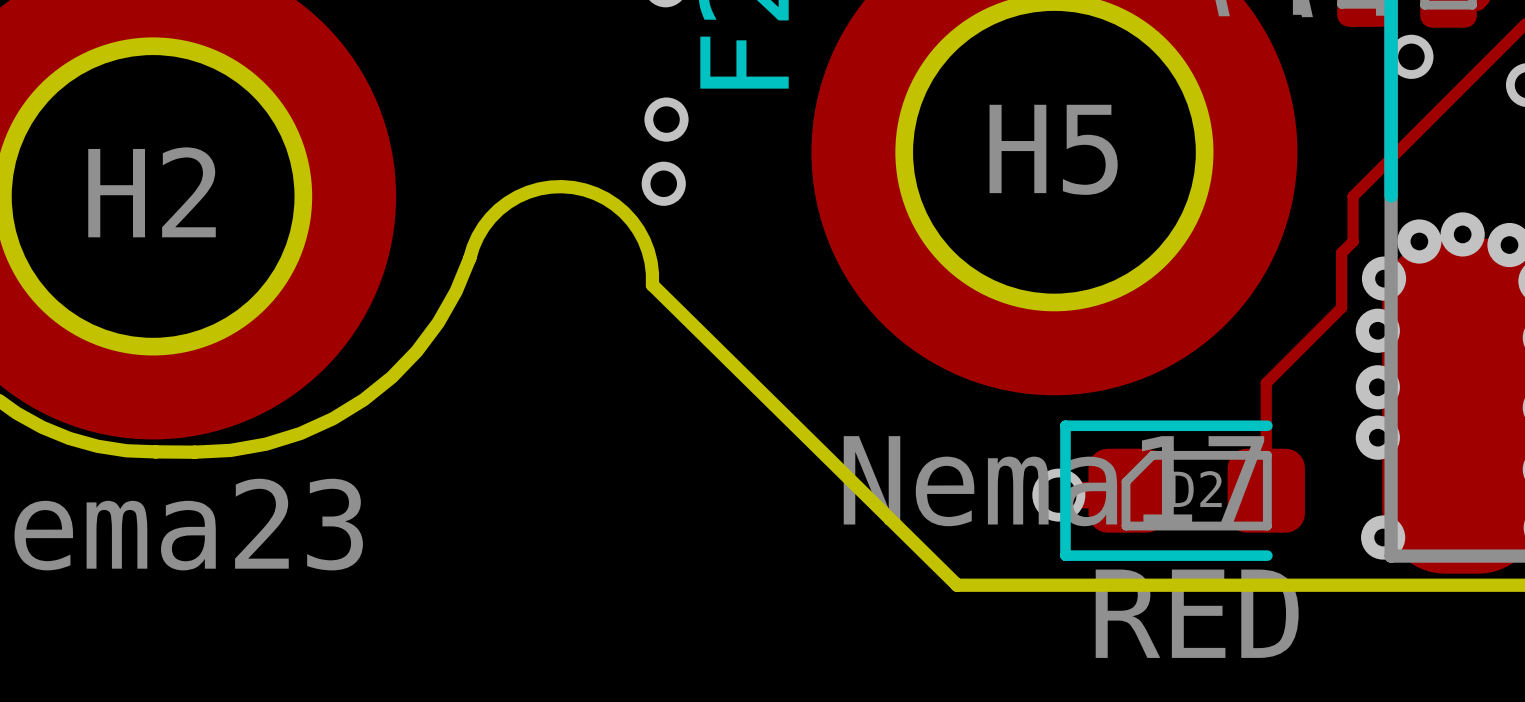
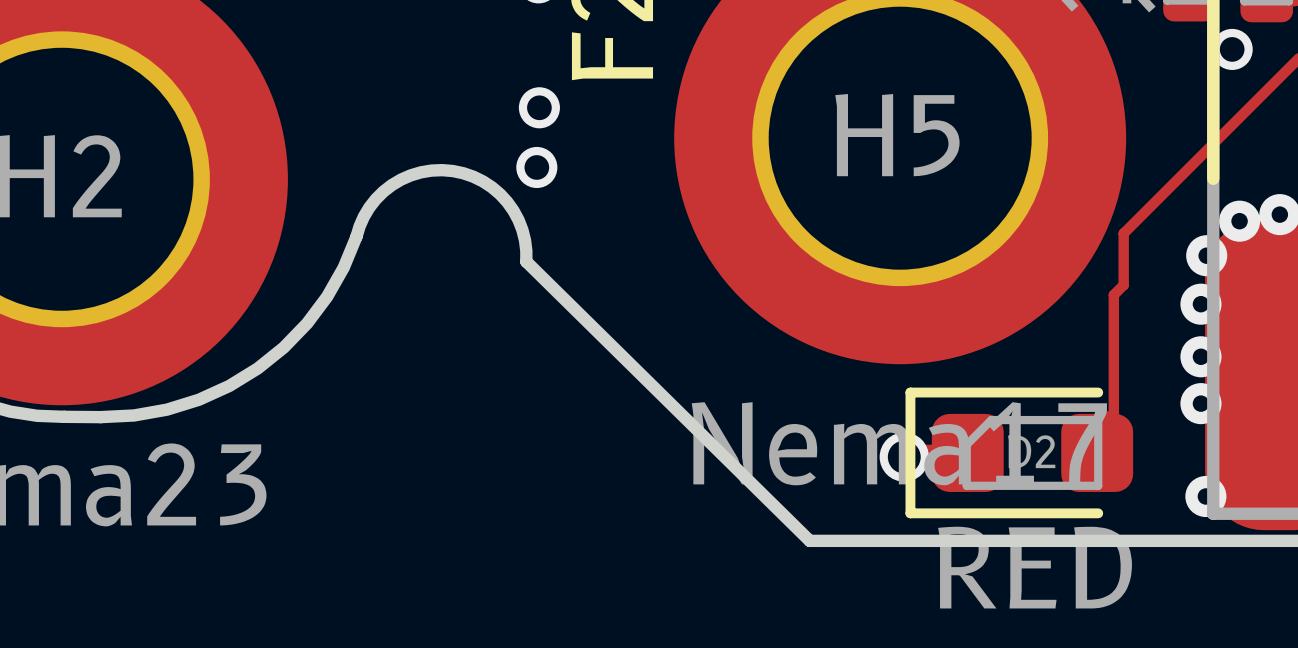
track: (1353, 196) (1353, 241) (1341, 253) (1341, 307) (1266, 383) (1266, 464) -> (1177, 179) (1123, 233) (1123, 285) (1113, 294) (1113, 416) (1109, 416) (1097, 428)

